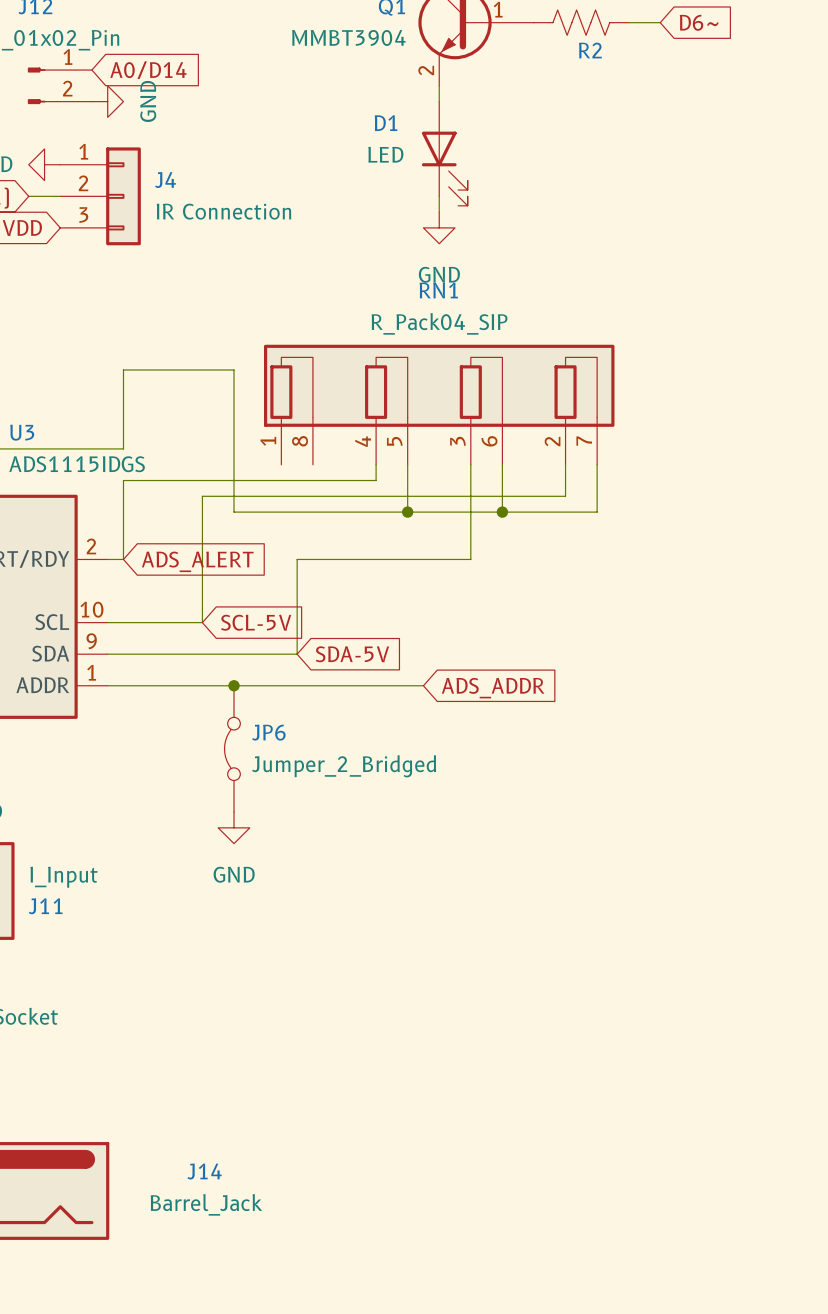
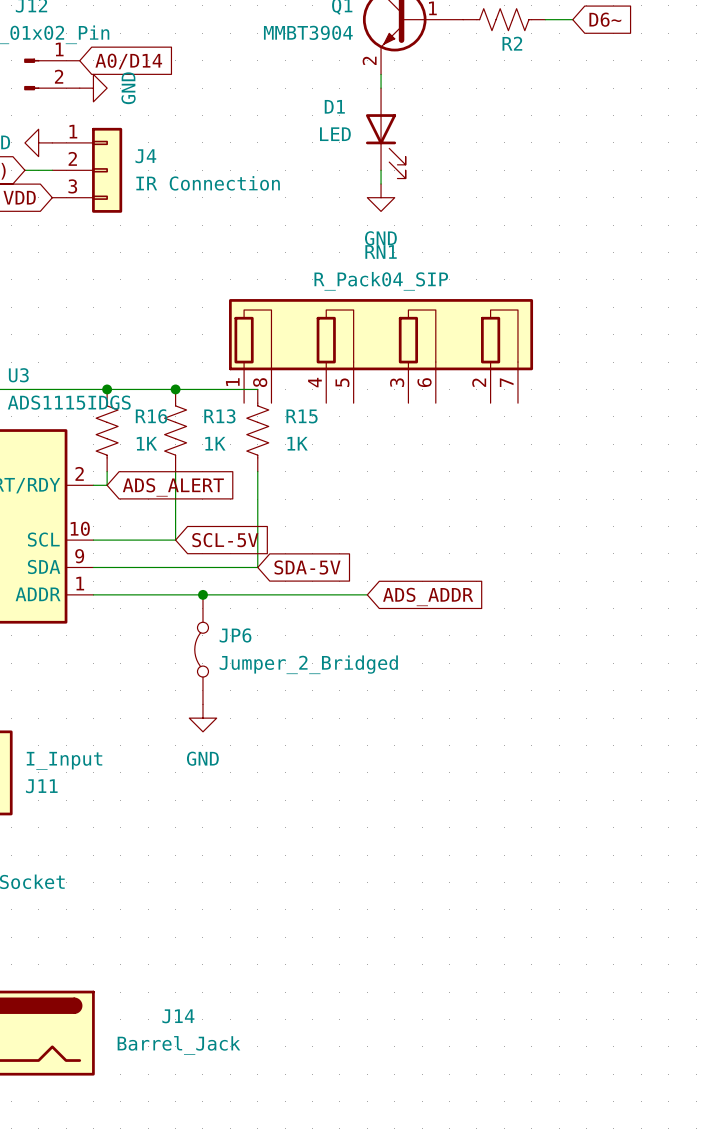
wire: (123, 448) (123, 370) (234, 370) (234, 512) (597, 512) (597, 464) -> (107, 389) (257, 389)
junction: none -> (107, 389)
junction: none -> (175, 389)
wire: (376, 464) (376, 480) (123, 480) (123, 543) -> none
wire: (407, 464) (407, 512) -> none
wire: (470, 464) (470, 559) (297, 559) -> (257, 471) (257, 485)
wire: (502, 464) (502, 512) -> none
wire: (565, 464) (565, 496) (202, 496) (202, 543) -> none
R16: none -> 1K (107, 430)
R13: none -> 1K (175, 430)
R15: none -> 1K (257, 430)
junction: (407, 512) -> none
junction: (502, 512) -> none

